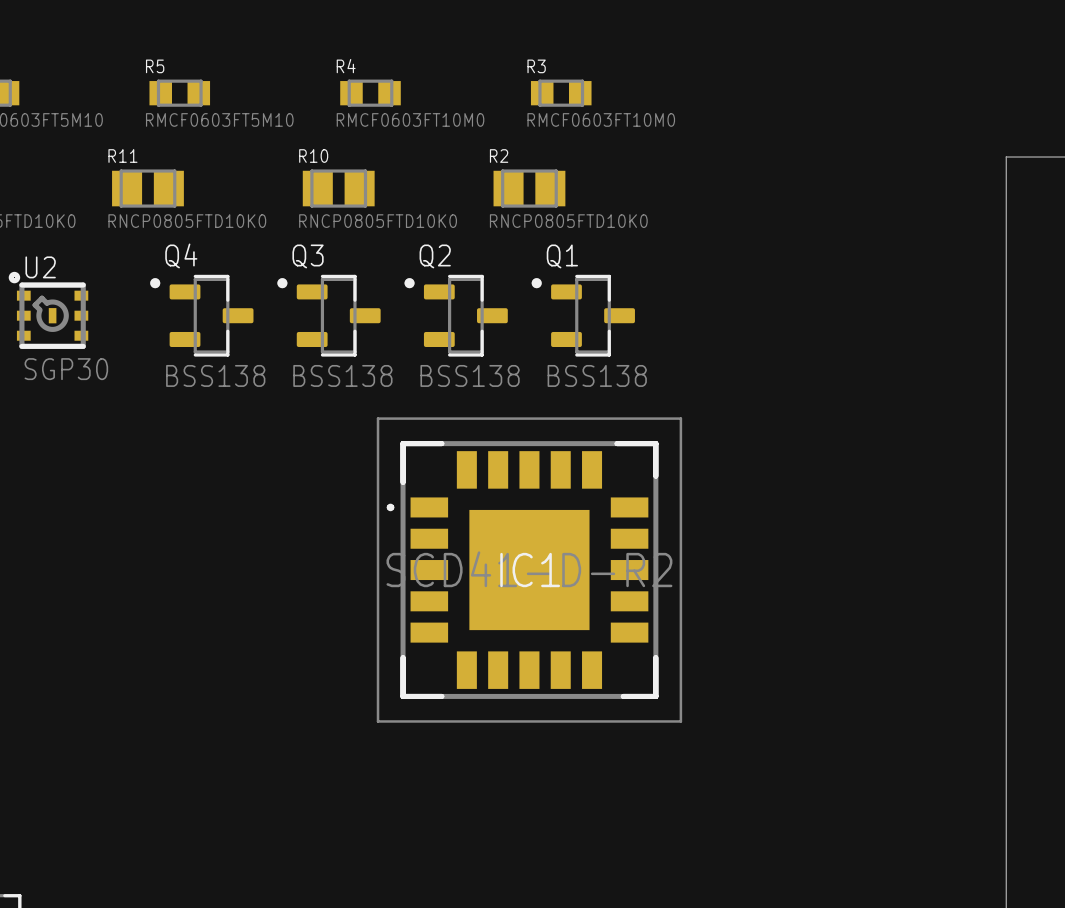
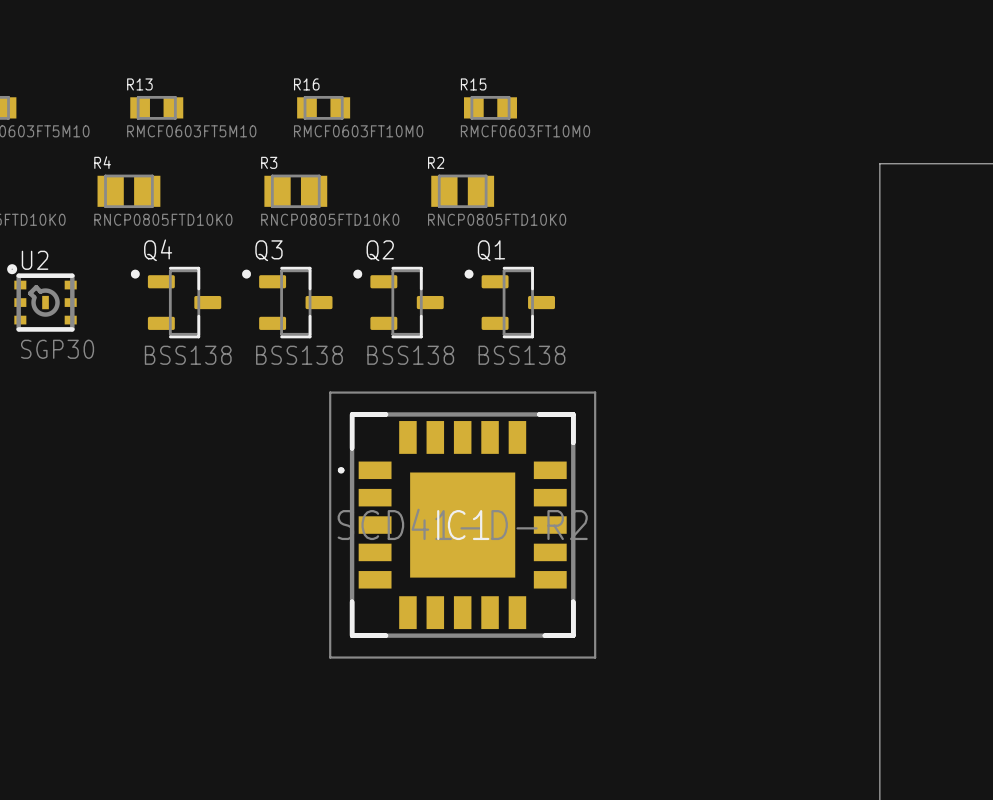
R5 name: R5 (155, 66) -> R13 (139, 84)
R4 name: R4 (346, 66) -> R16 (306, 84)
R3 name: R3 (536, 66) -> R15 (473, 84)
R11 name: R11 (122, 156) -> R4 (102, 162)
R10 name: R10 (313, 156) -> R3 (269, 162)

